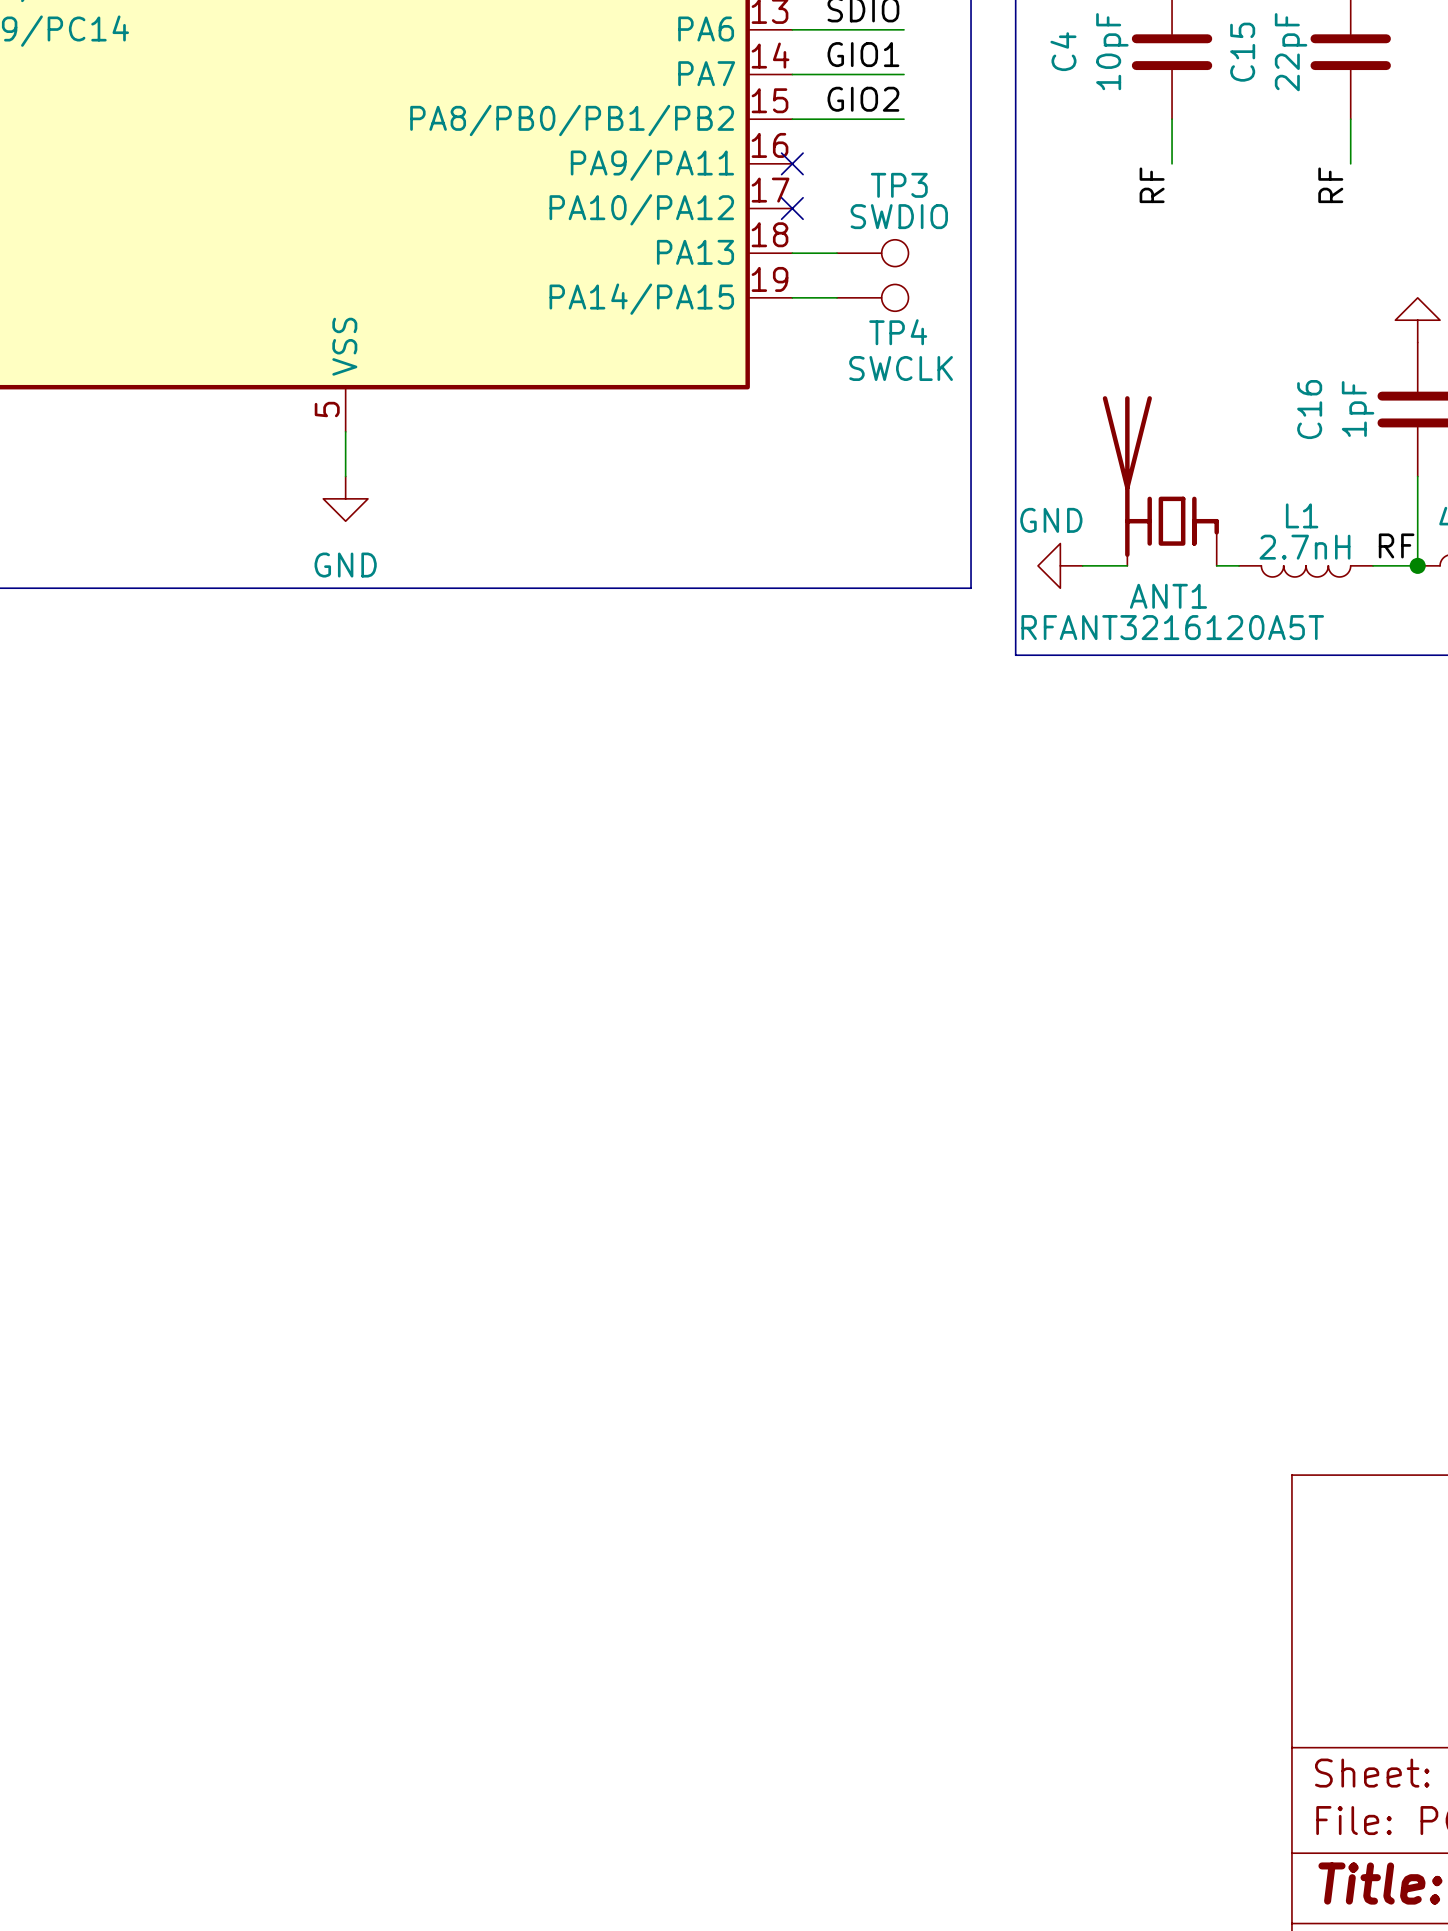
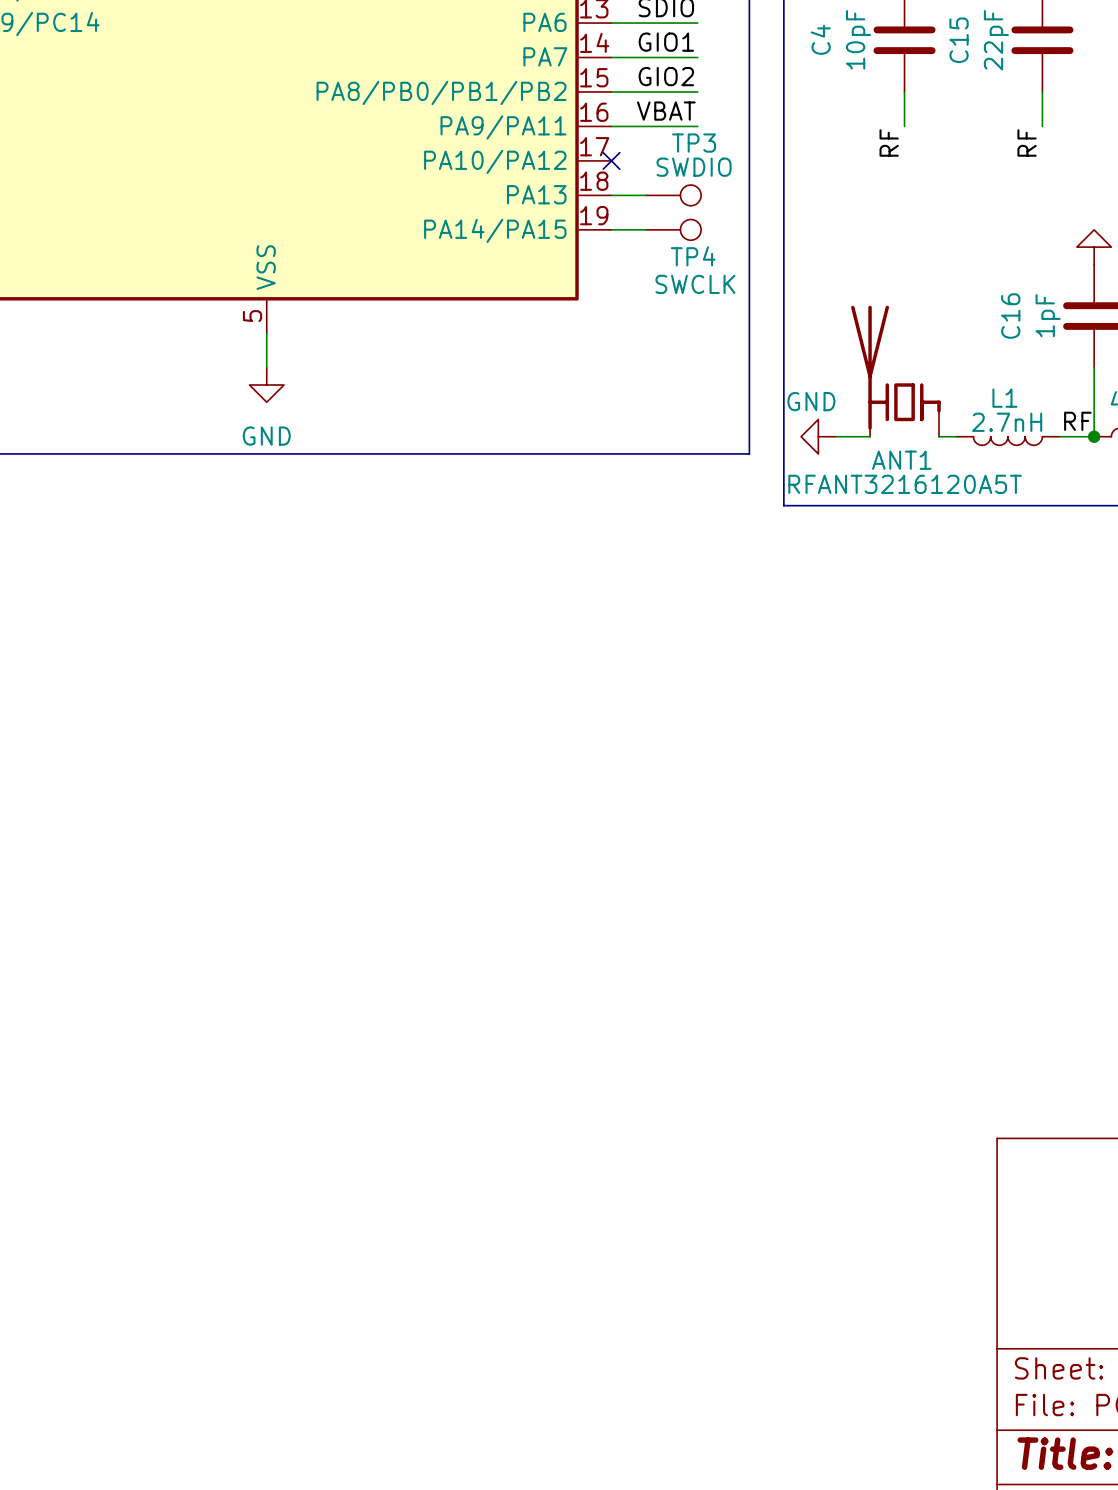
label: none -> VBAT (666, 111)
wire: none -> (611, 126) (697, 126)
no-connect mark: (792, 163) -> none

